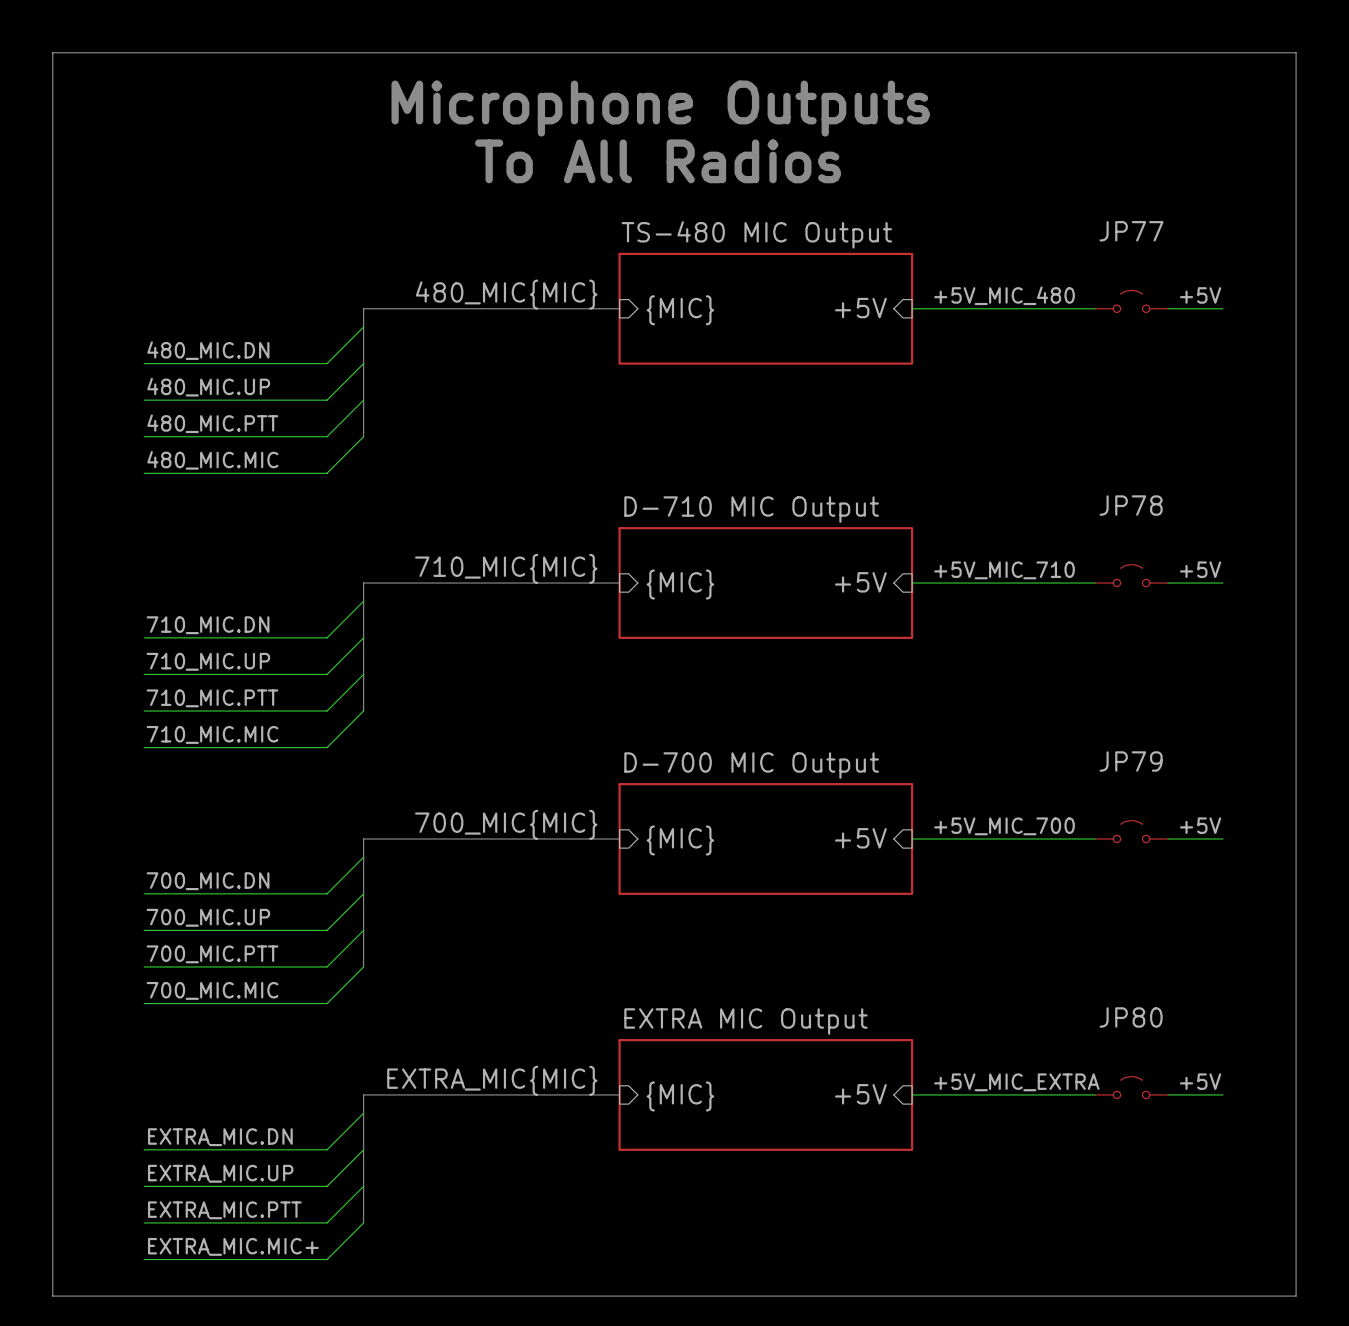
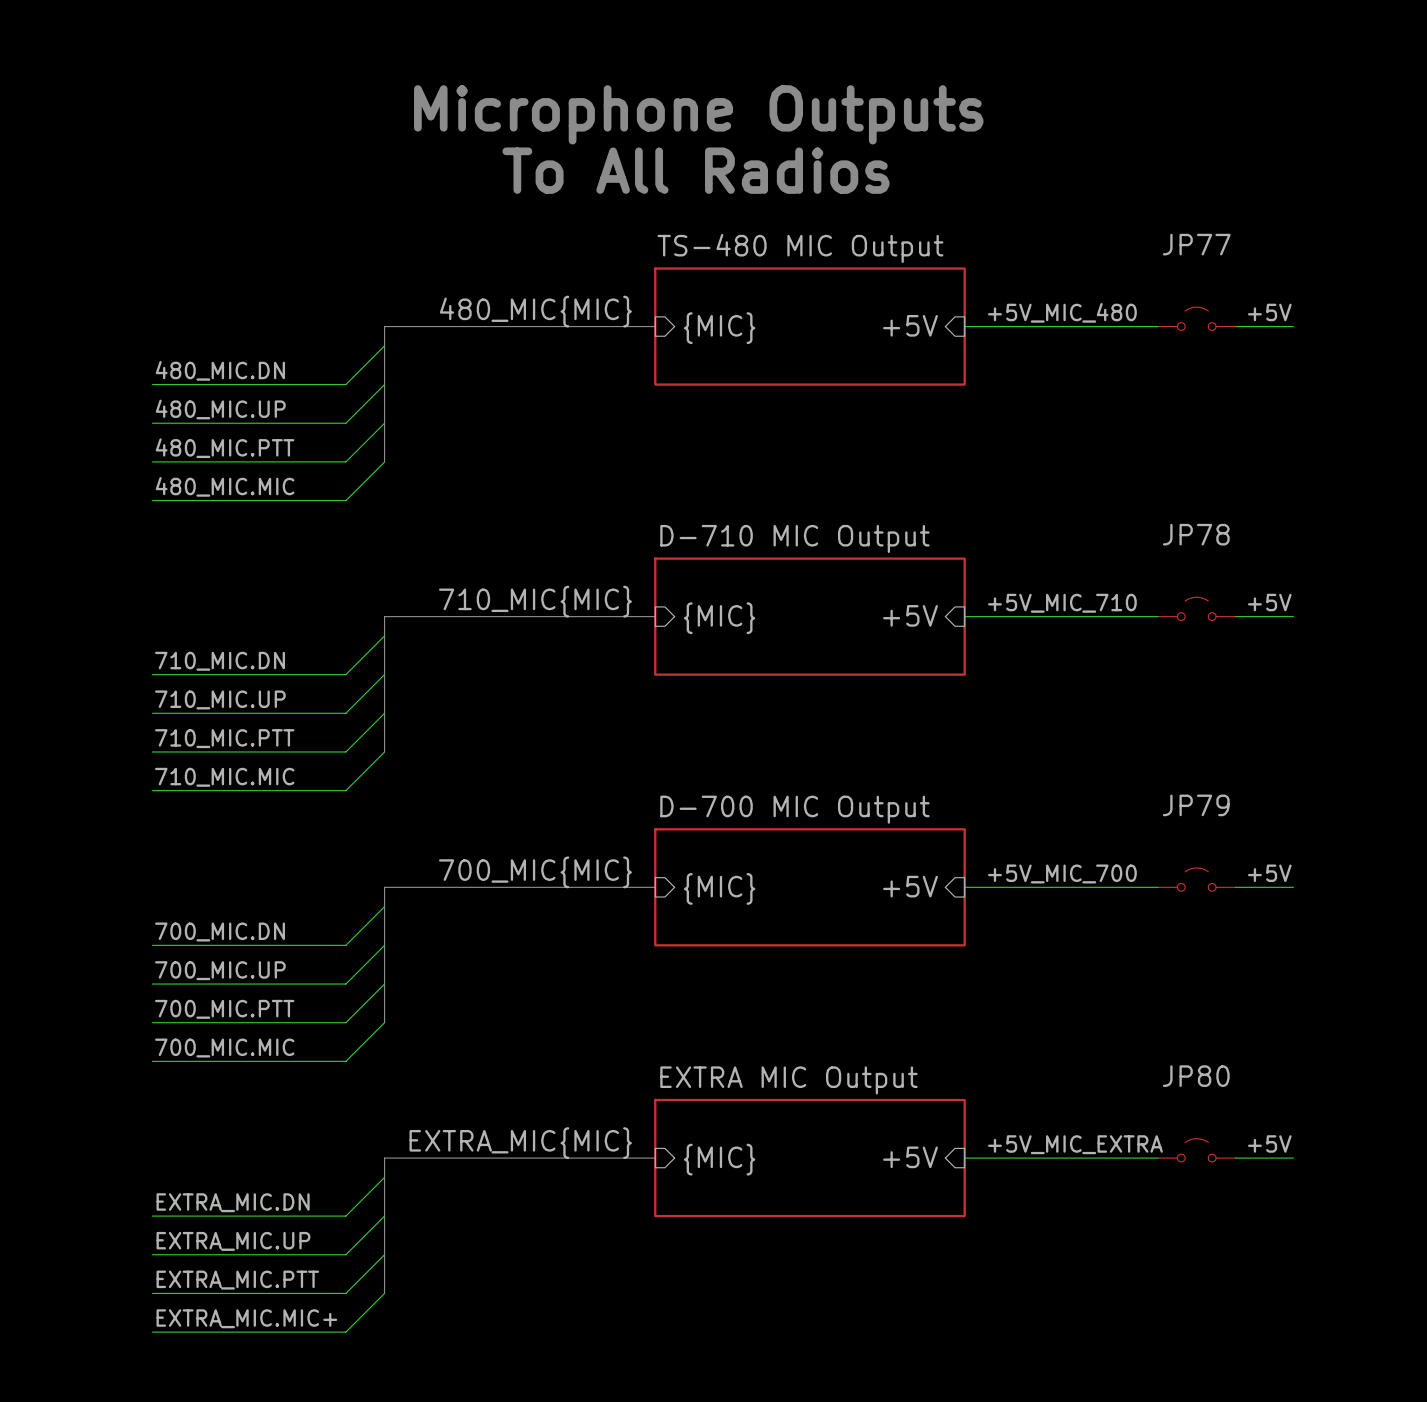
line: (52, 52) (1296, 52) (1296, 1296) (52, 1296) (52, 52) -> none

